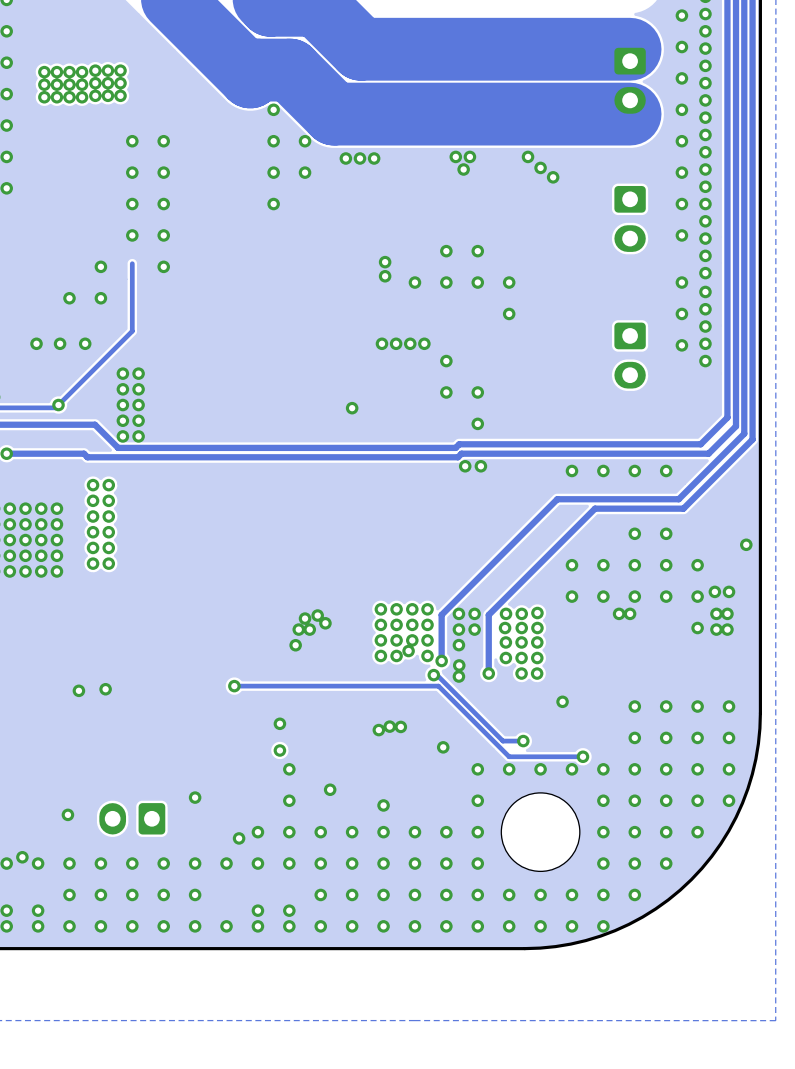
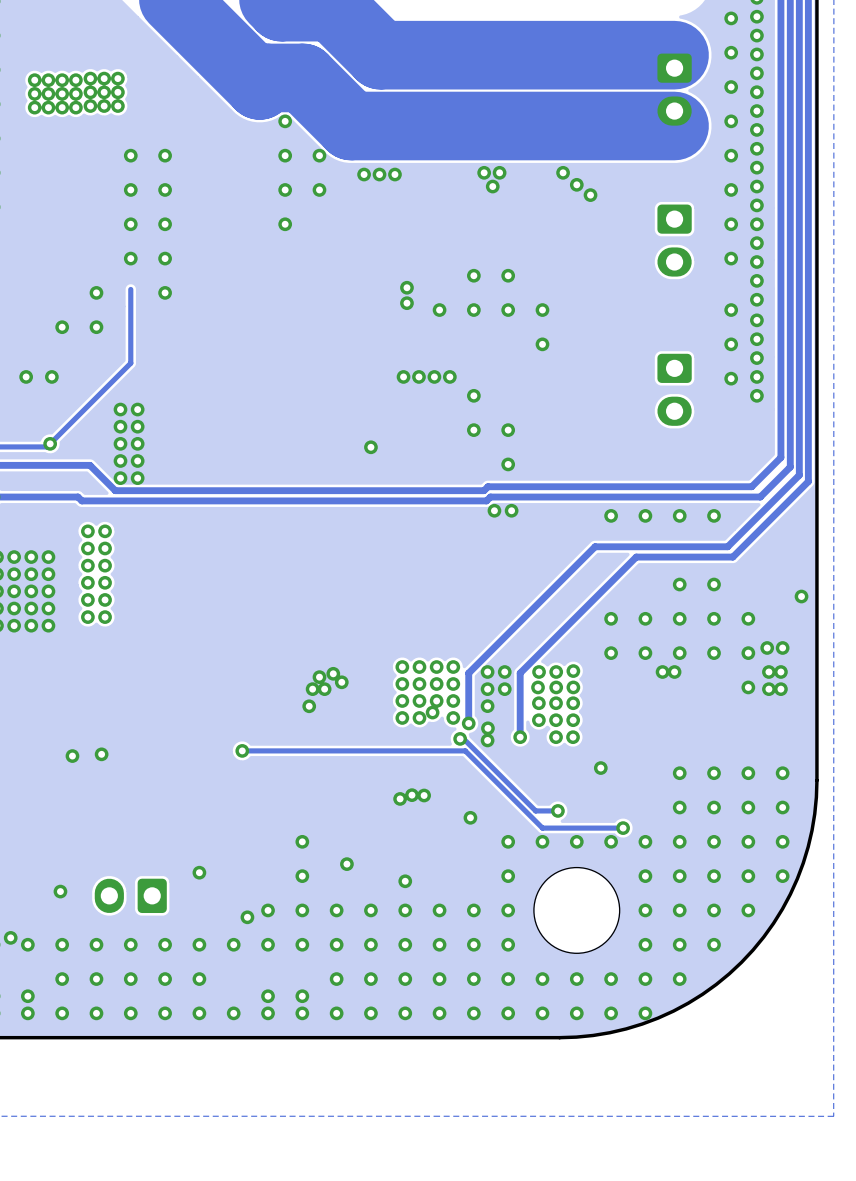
via: (85, 343) -> none
via: (279, 723) -> none
via: (279, 750) -> none

